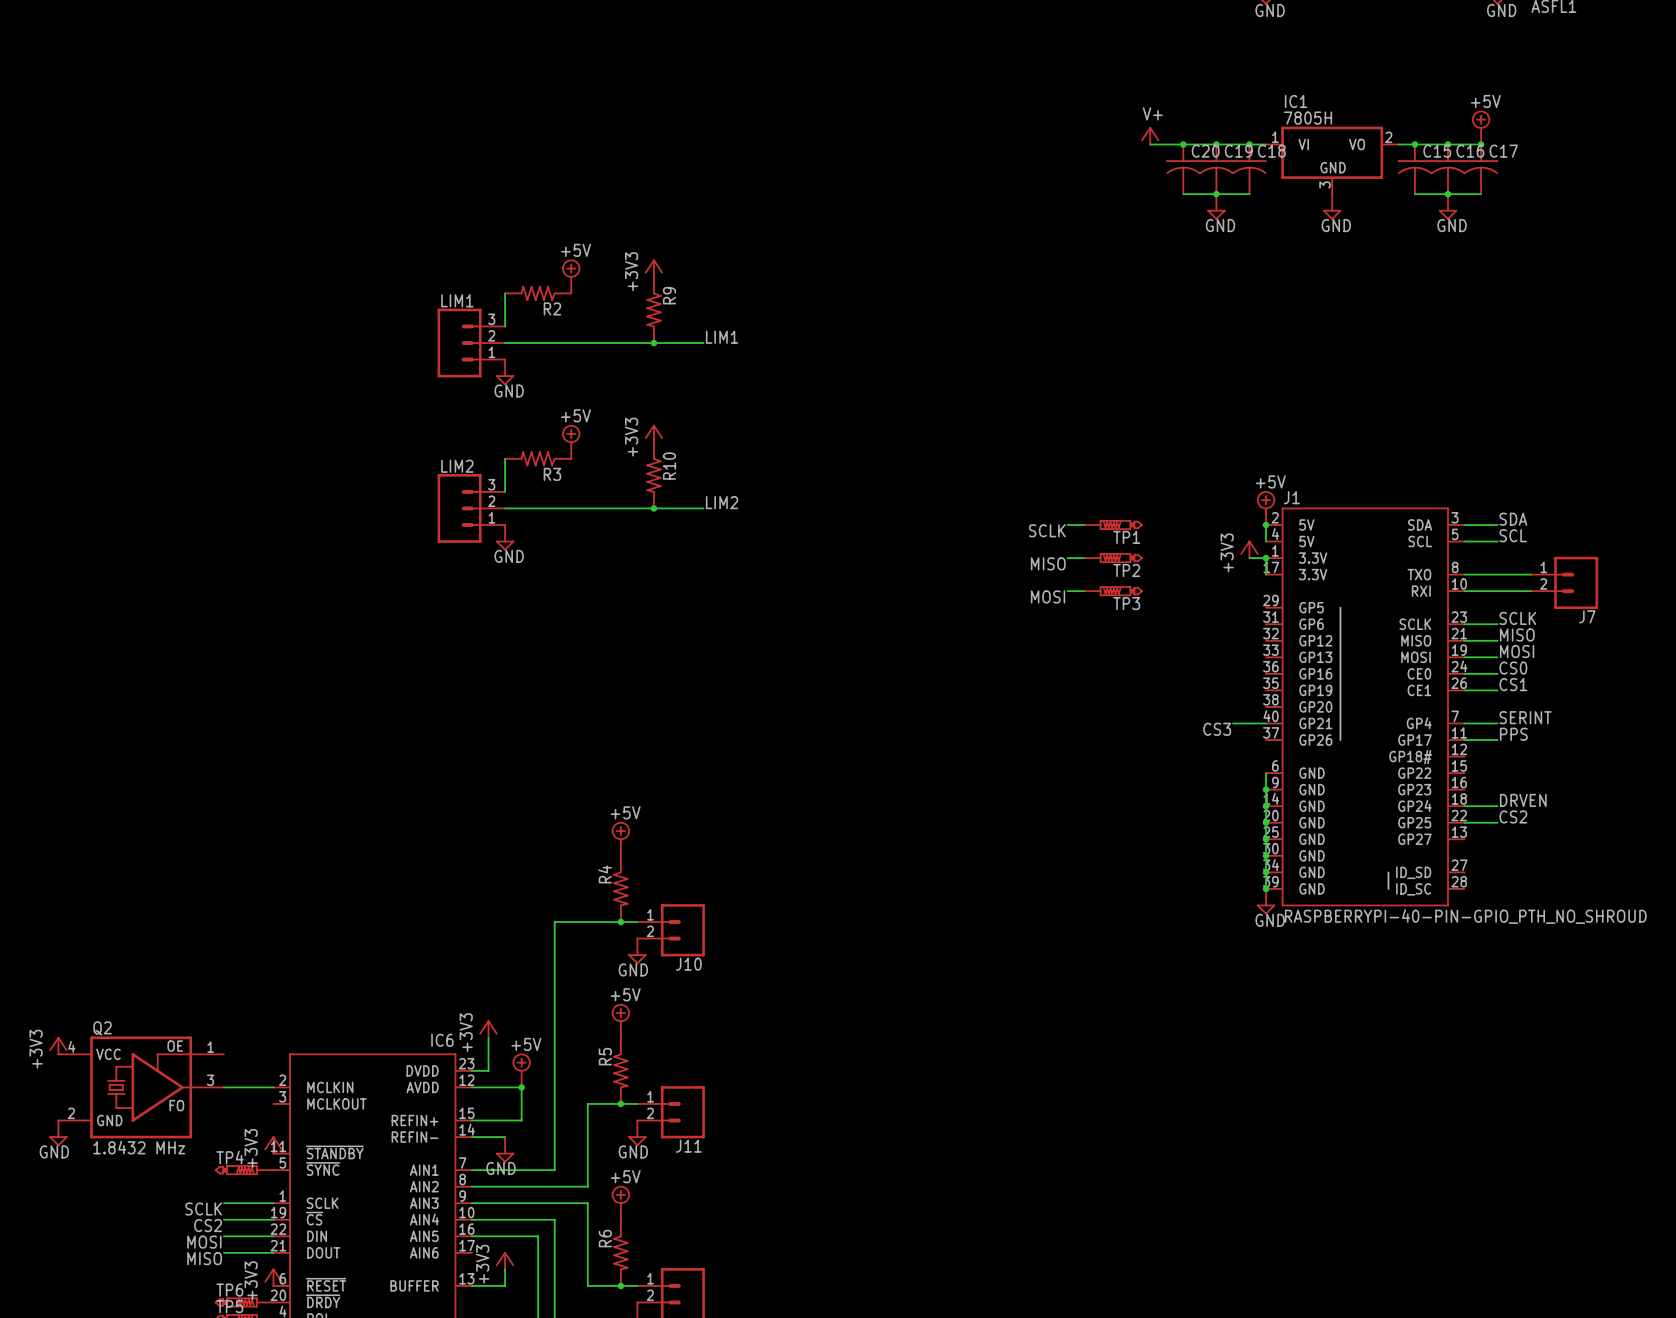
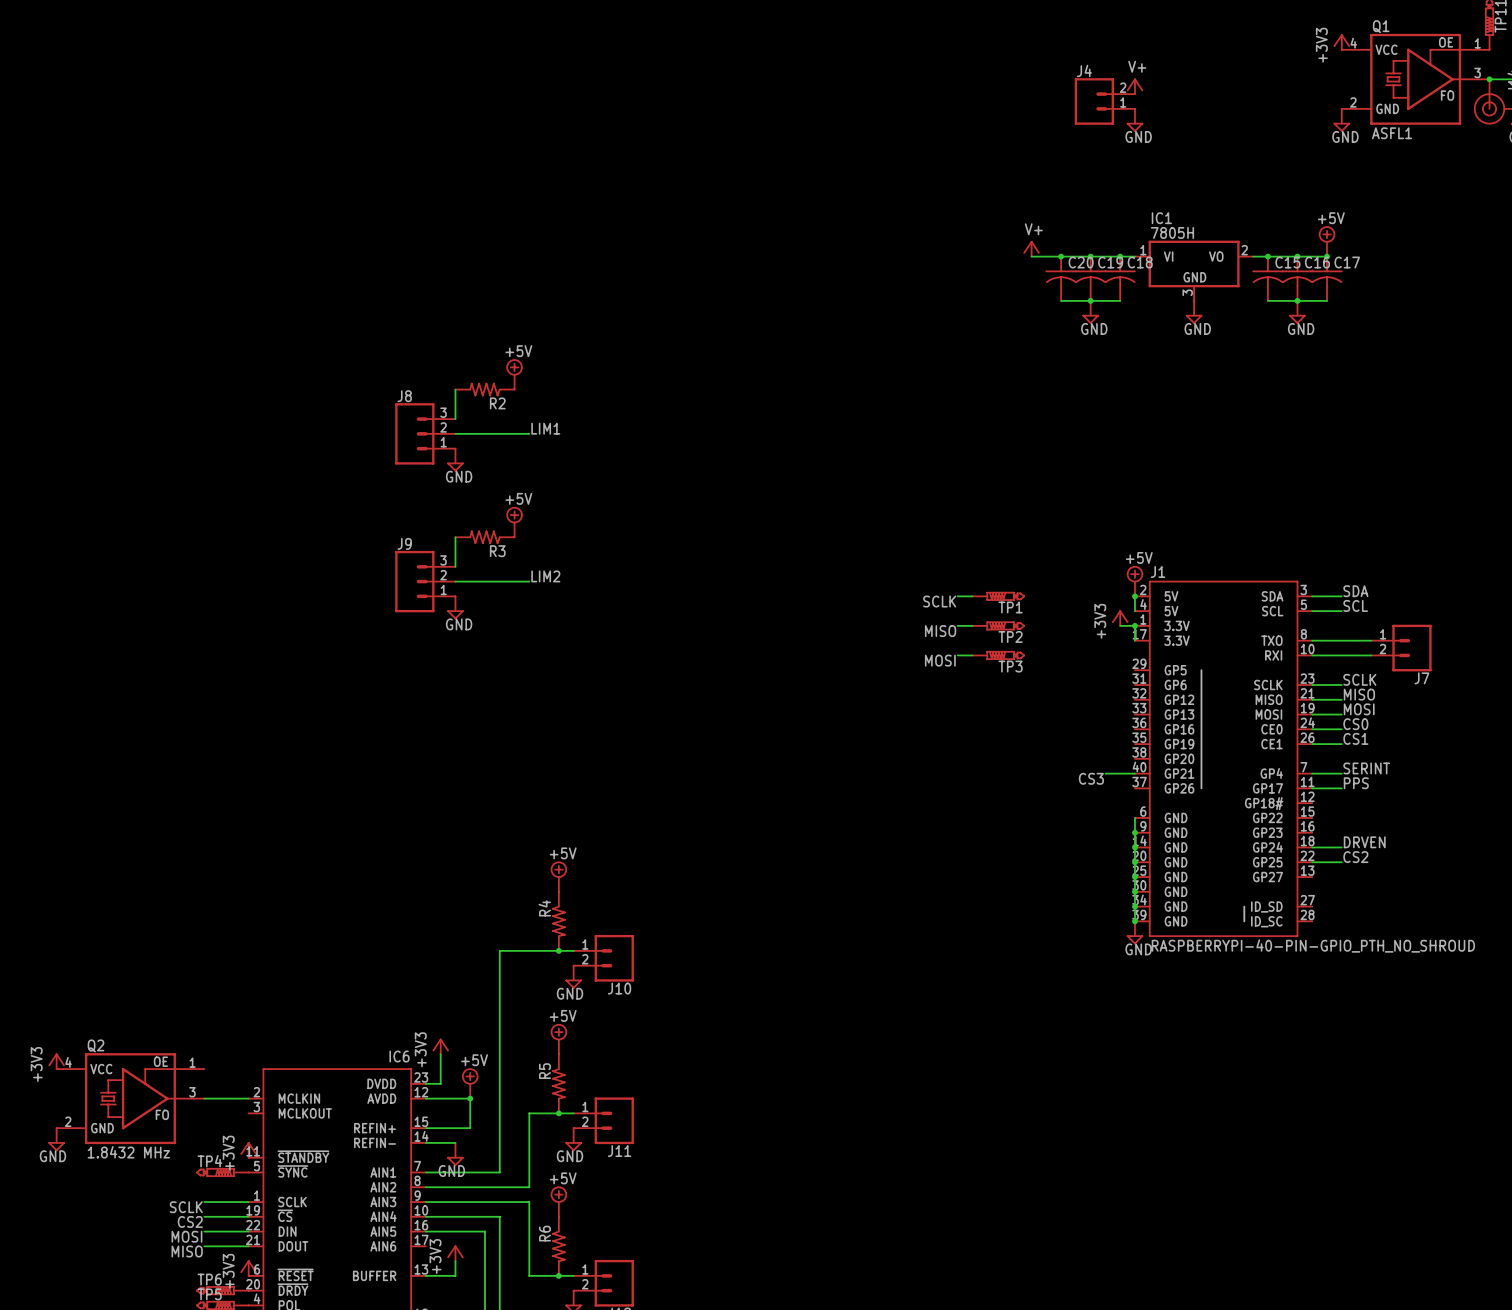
power symbol: +3V3 (653, 268) -> none
LIM1 name: LIM1 (457, 300) -> J8 (404, 396)
R9: (653, 309) -> none
label position: LIM1 (722, 337) -> LIM1 (545, 428)
wire: (587, 343) (703, 343) -> none
junction: (653, 343) -> none
power symbol: +3V3 (653, 433) -> none
LIM2 name: LIM2 (457, 466) -> J9 (404, 543)
R10: (653, 475) -> none
label position: LIM2 (722, 502) -> LIM2 (545, 576)
wire: (587, 508) (703, 508) -> none
junction: (653, 508) -> none

